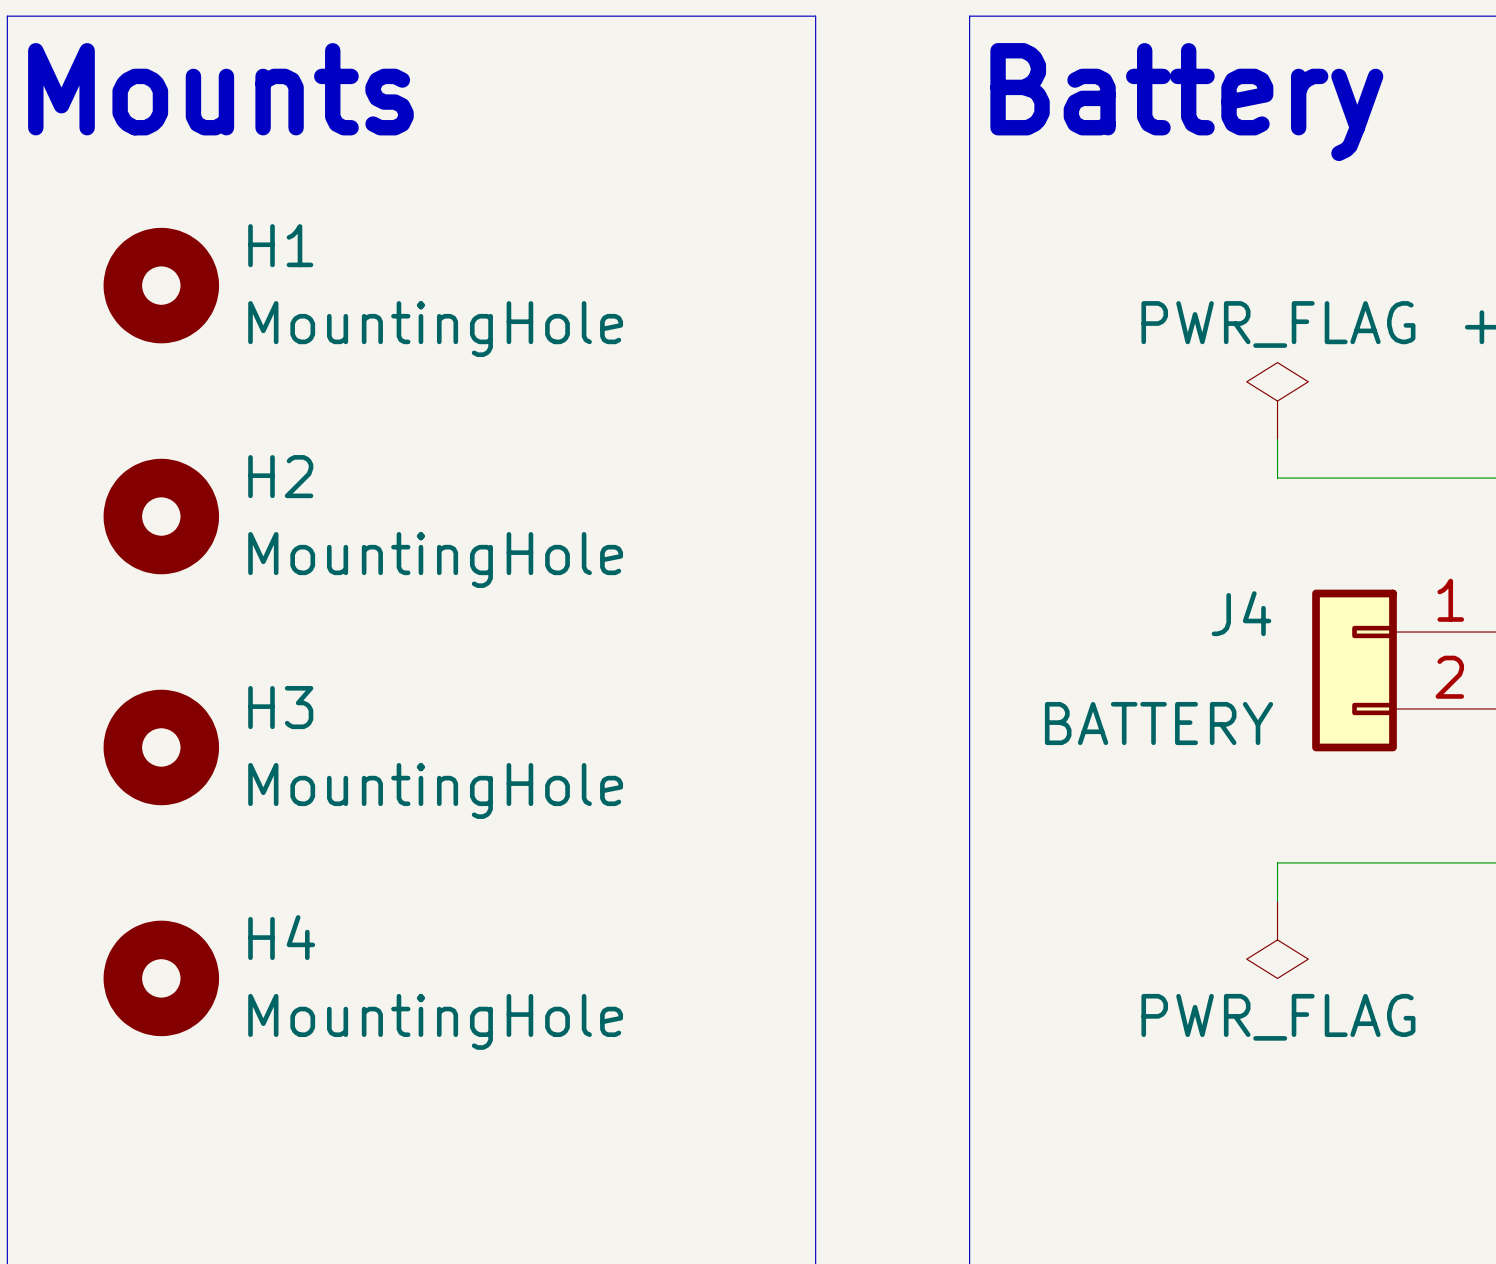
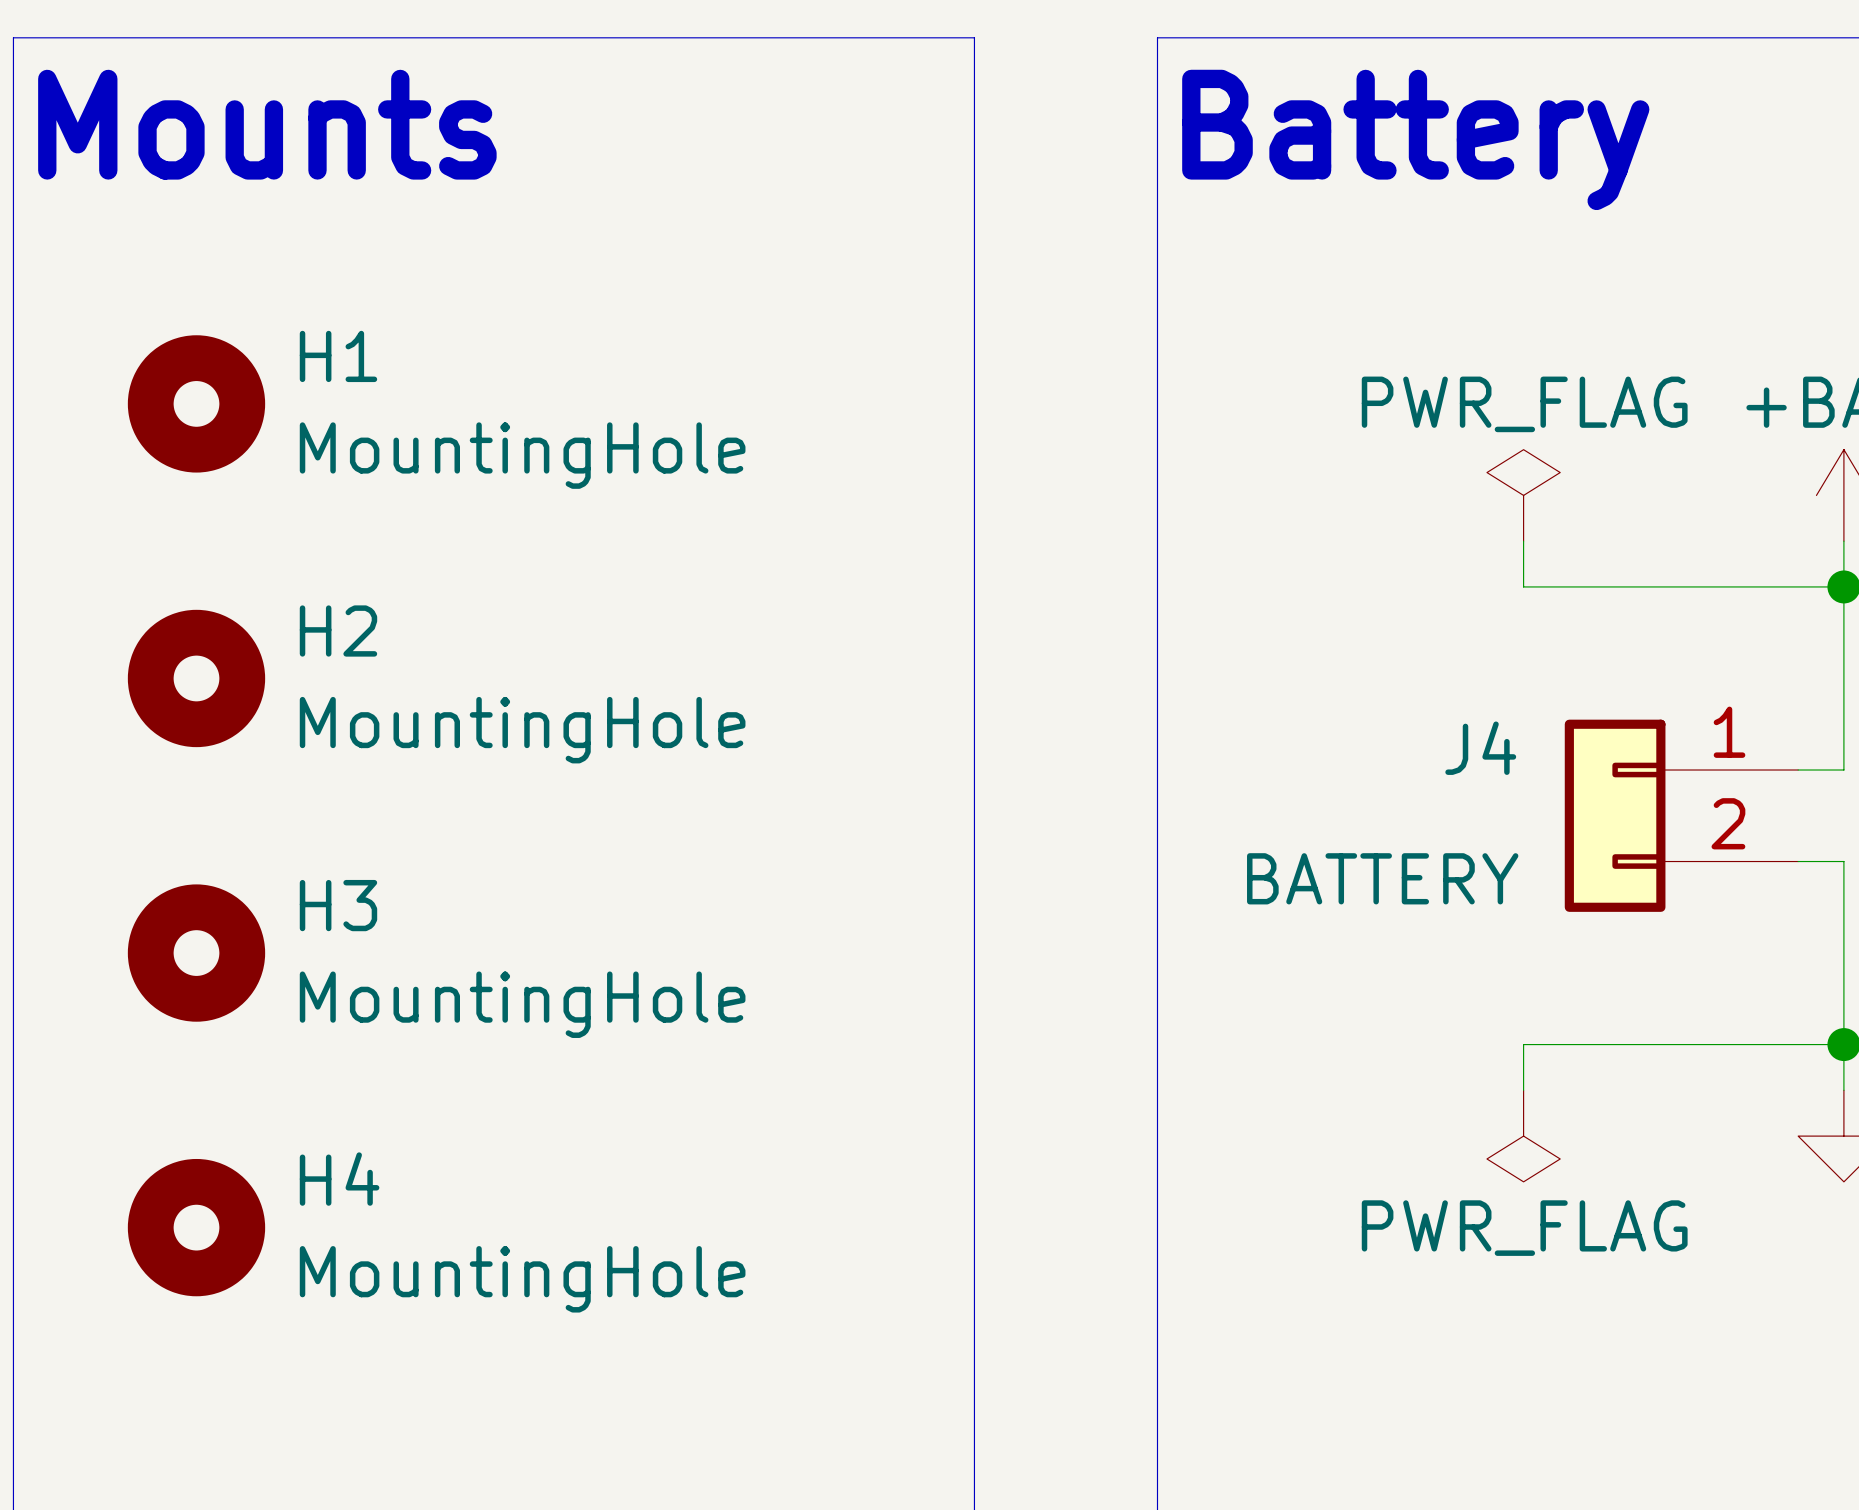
H1 position: (161, 285) -> (196, 403)
H2 position: (161, 516) -> (196, 678)
H3 position: (161, 747) -> (196, 953)
H4 position: (161, 978) -> (196, 1227)

